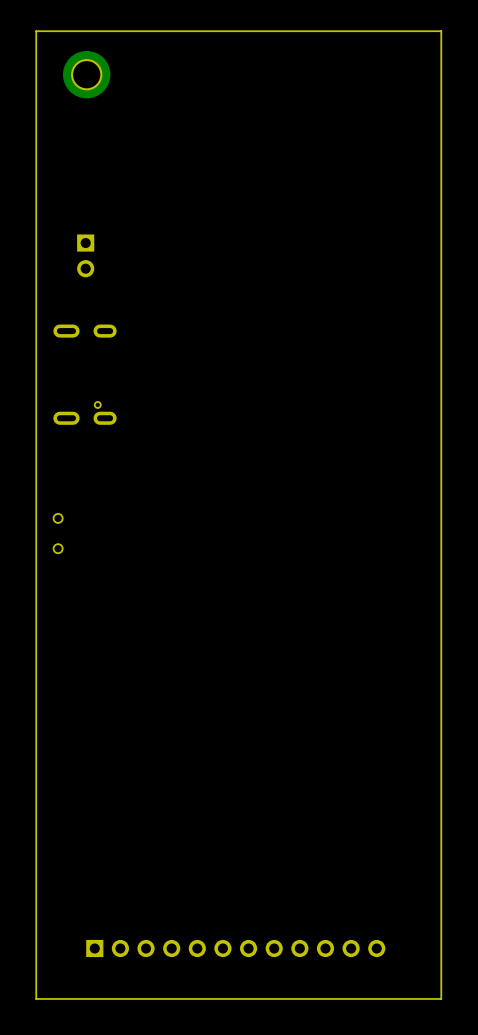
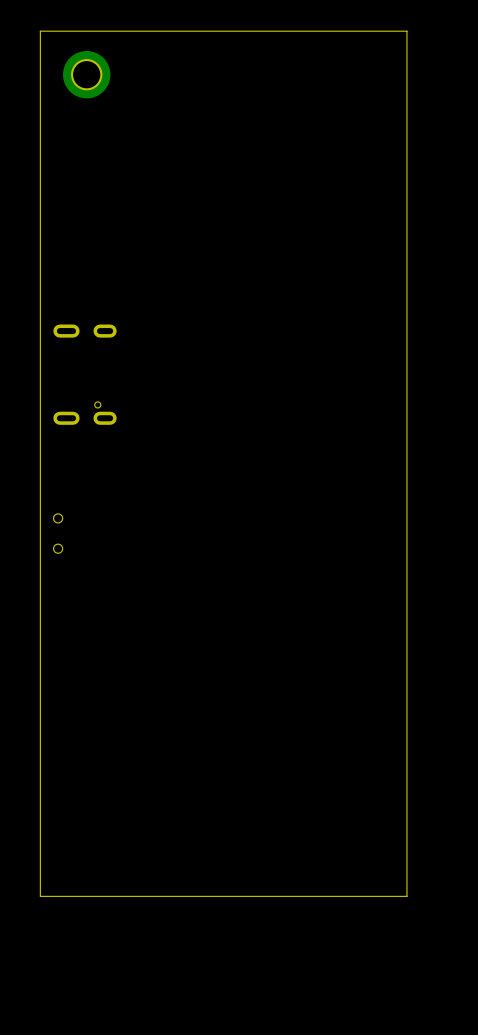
board edge: (406, 31) (441, 31) (441, 998) (36, 998) (36, 31) (40, 31) -> (406, 31) (406, 896) (40, 896) (40, 31)
part: (85, 255) -> none
part: (235, 948) -> none

